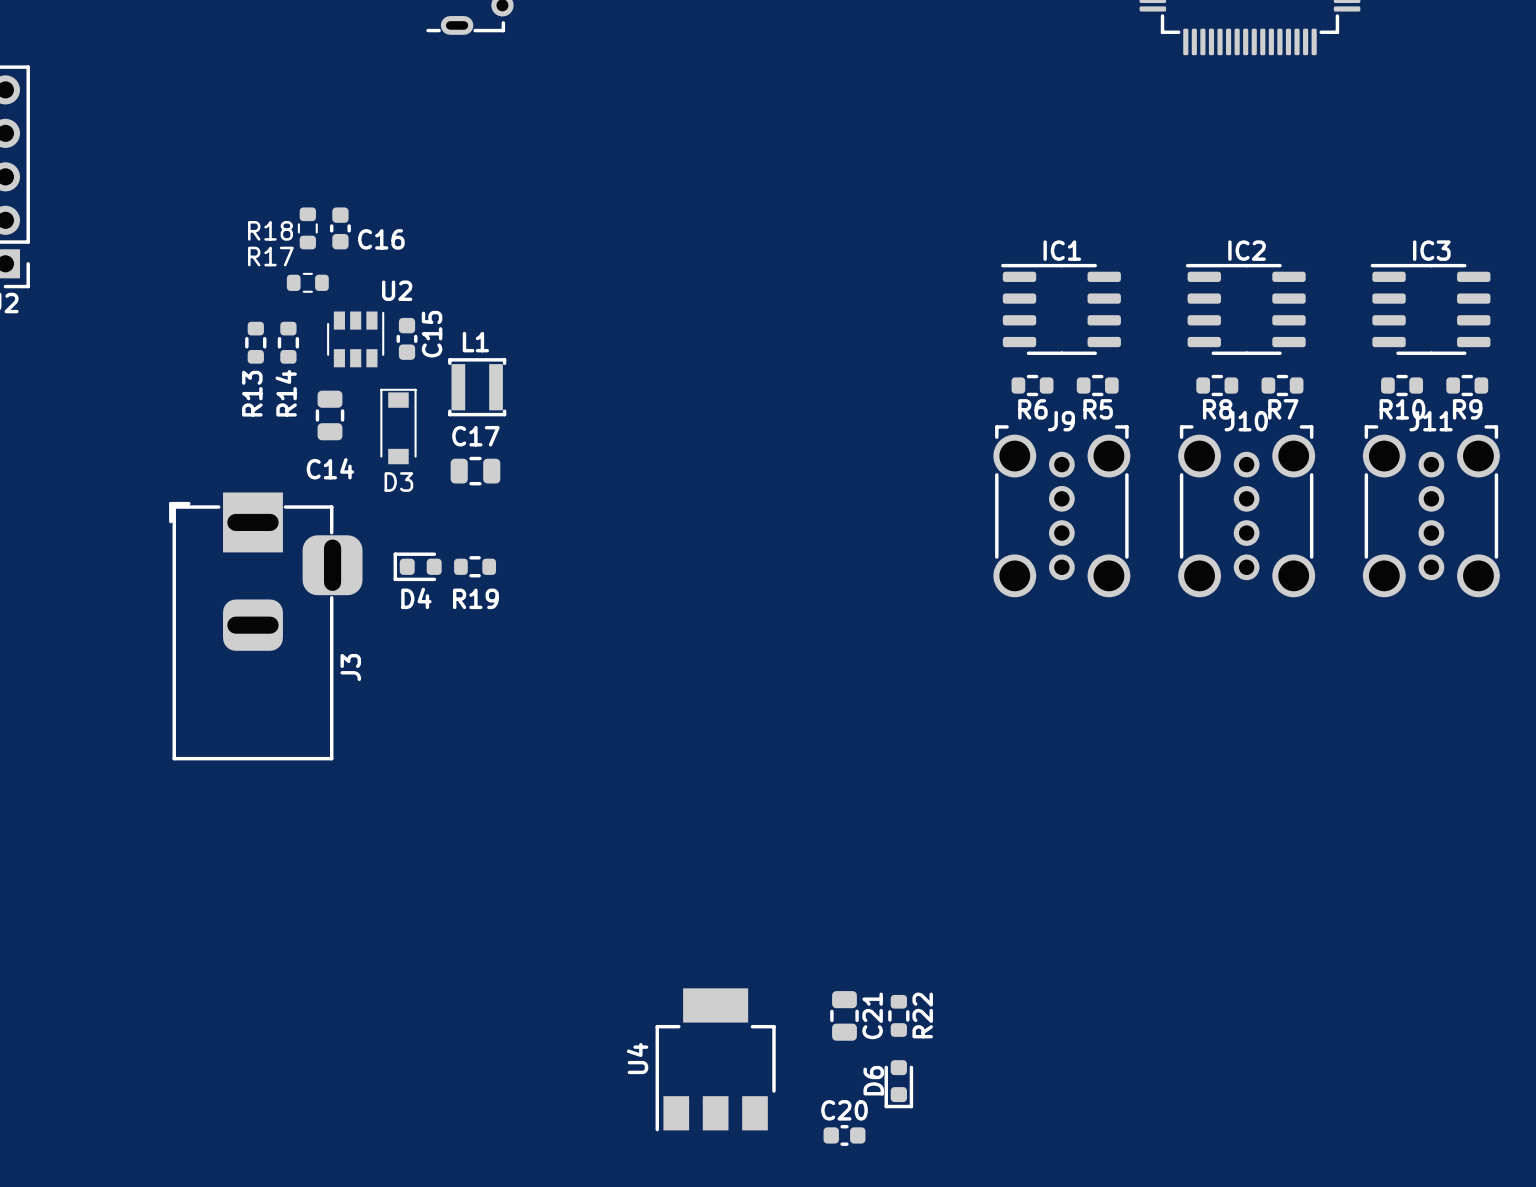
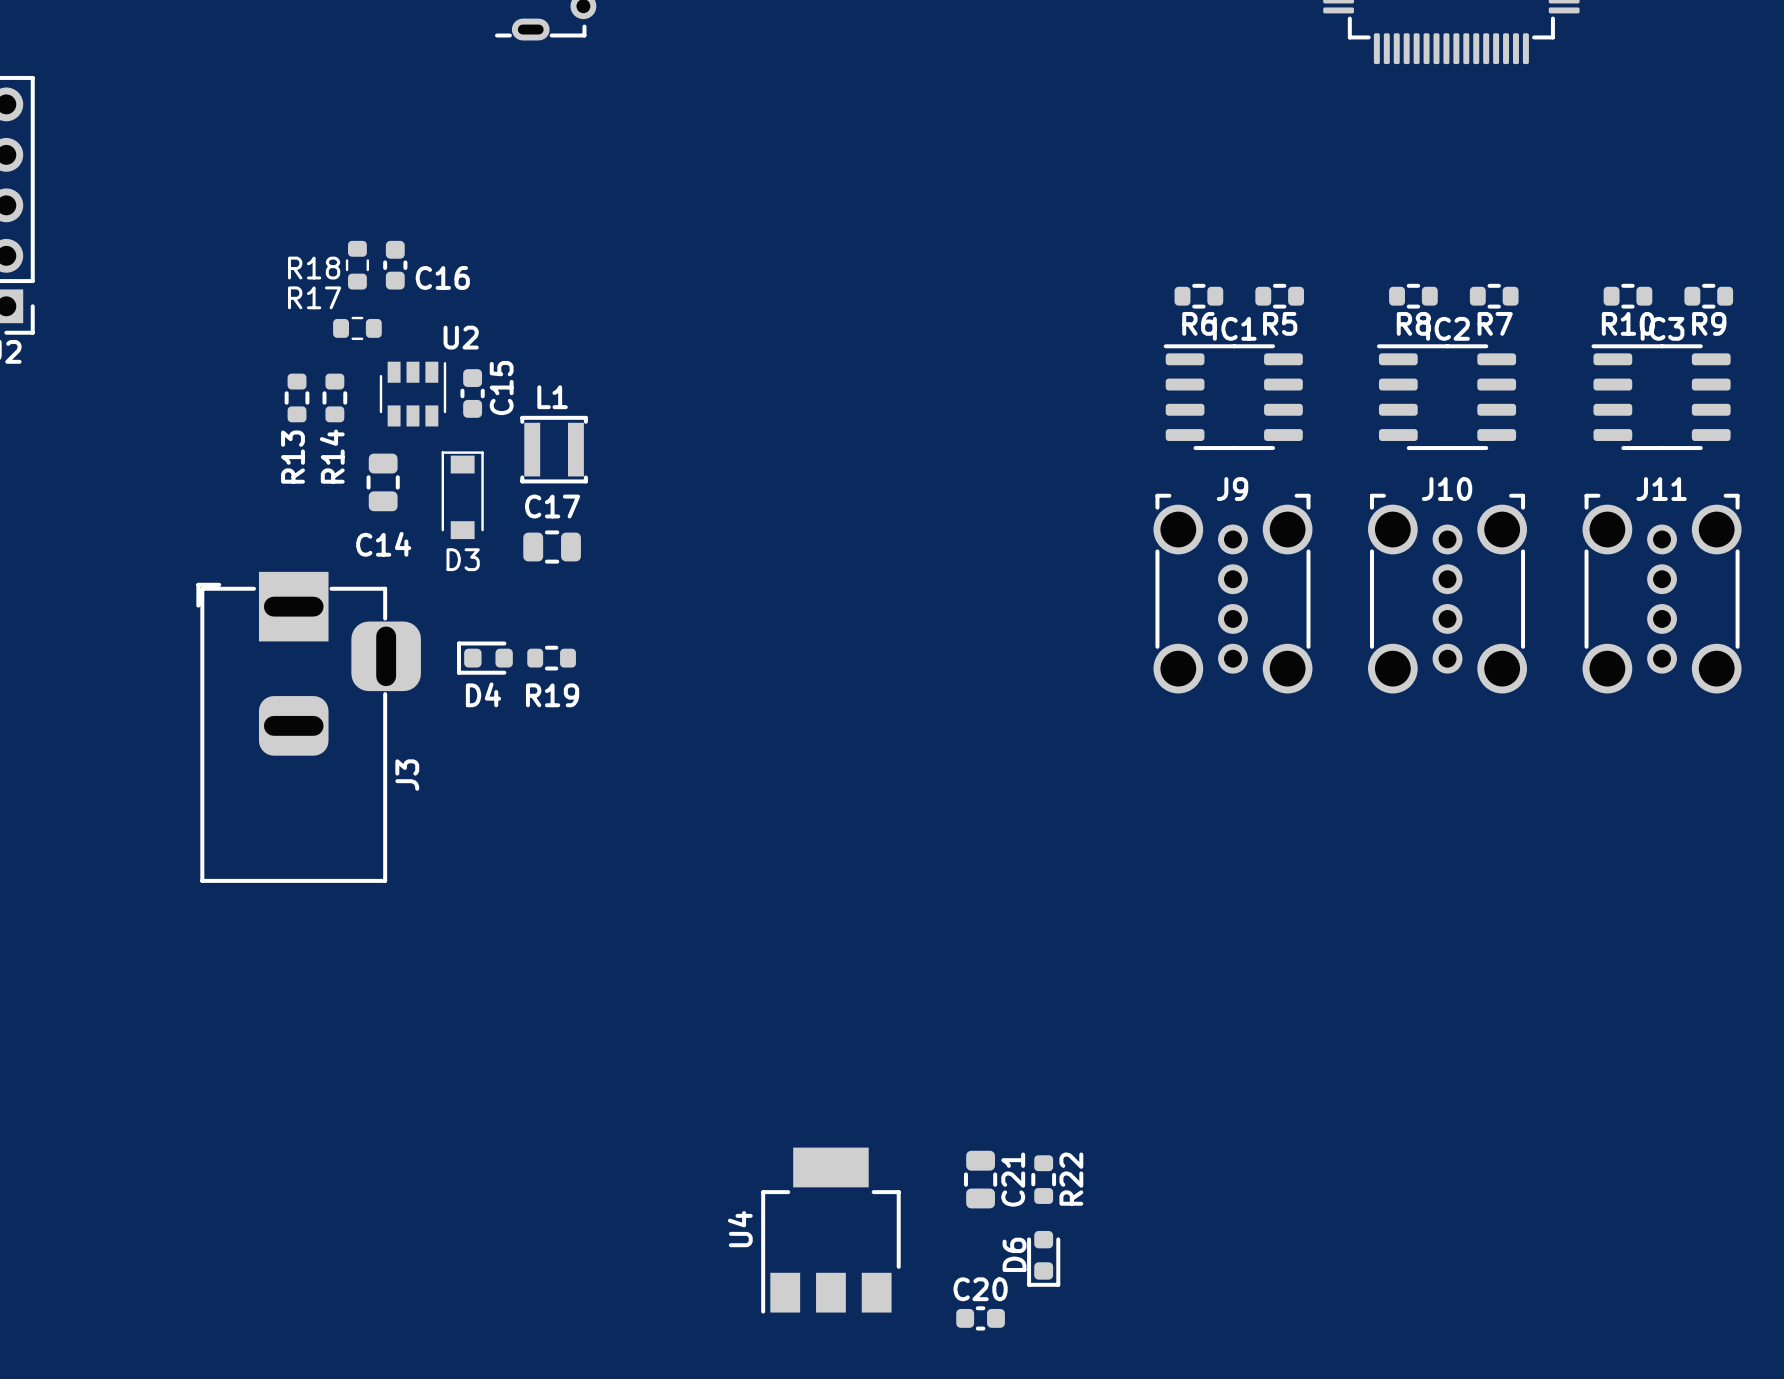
IC1 position: (1061, 309) -> (1233, 397)
IC2 position: (1245, 309) -> (1446, 397)
IC3 position: (1430, 309) -> (1661, 397)
R6 position: (1032, 385) -> (1198, 296)
R5 position: (1097, 385) -> (1279, 296)
R8 position: (1217, 385) -> (1413, 296)
R7 position: (1282, 385) -> (1494, 296)
R10 position: (1402, 385) -> (1627, 296)
R9 position: (1467, 385) -> (1708, 296)

